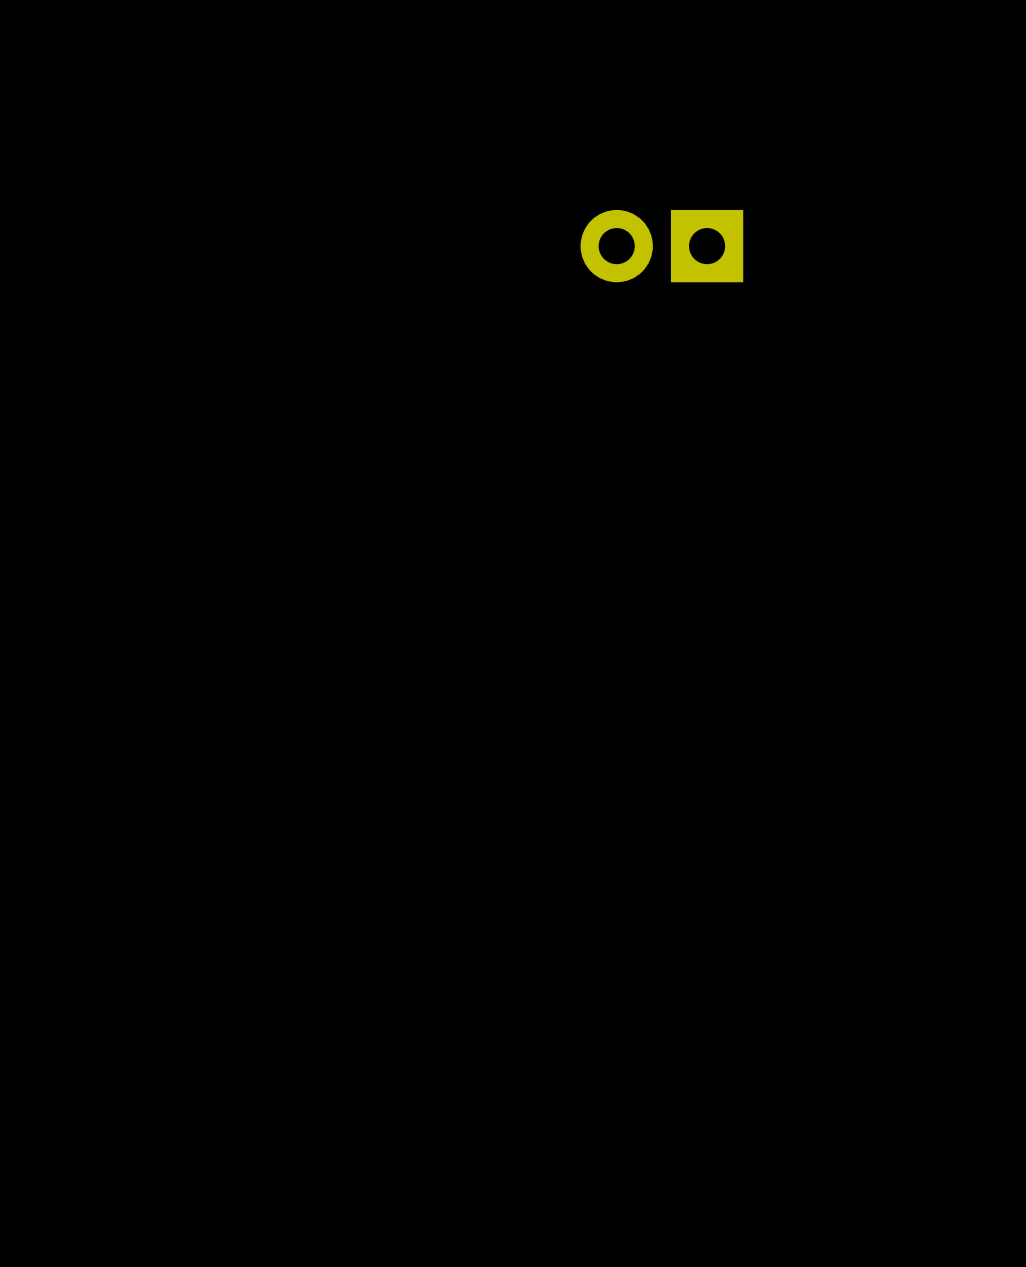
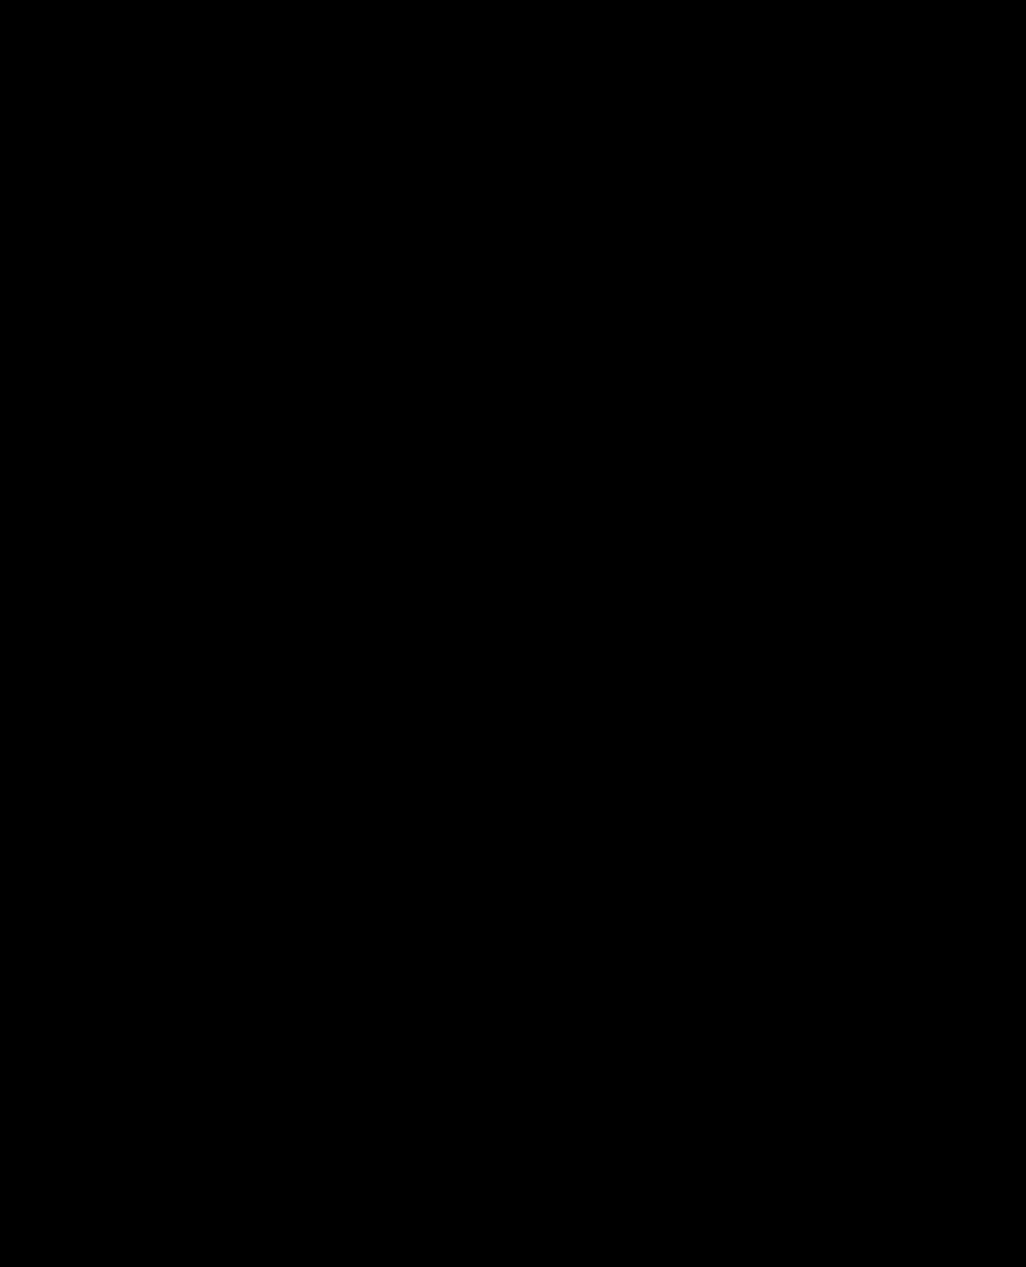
part: (661, 246) -> none

